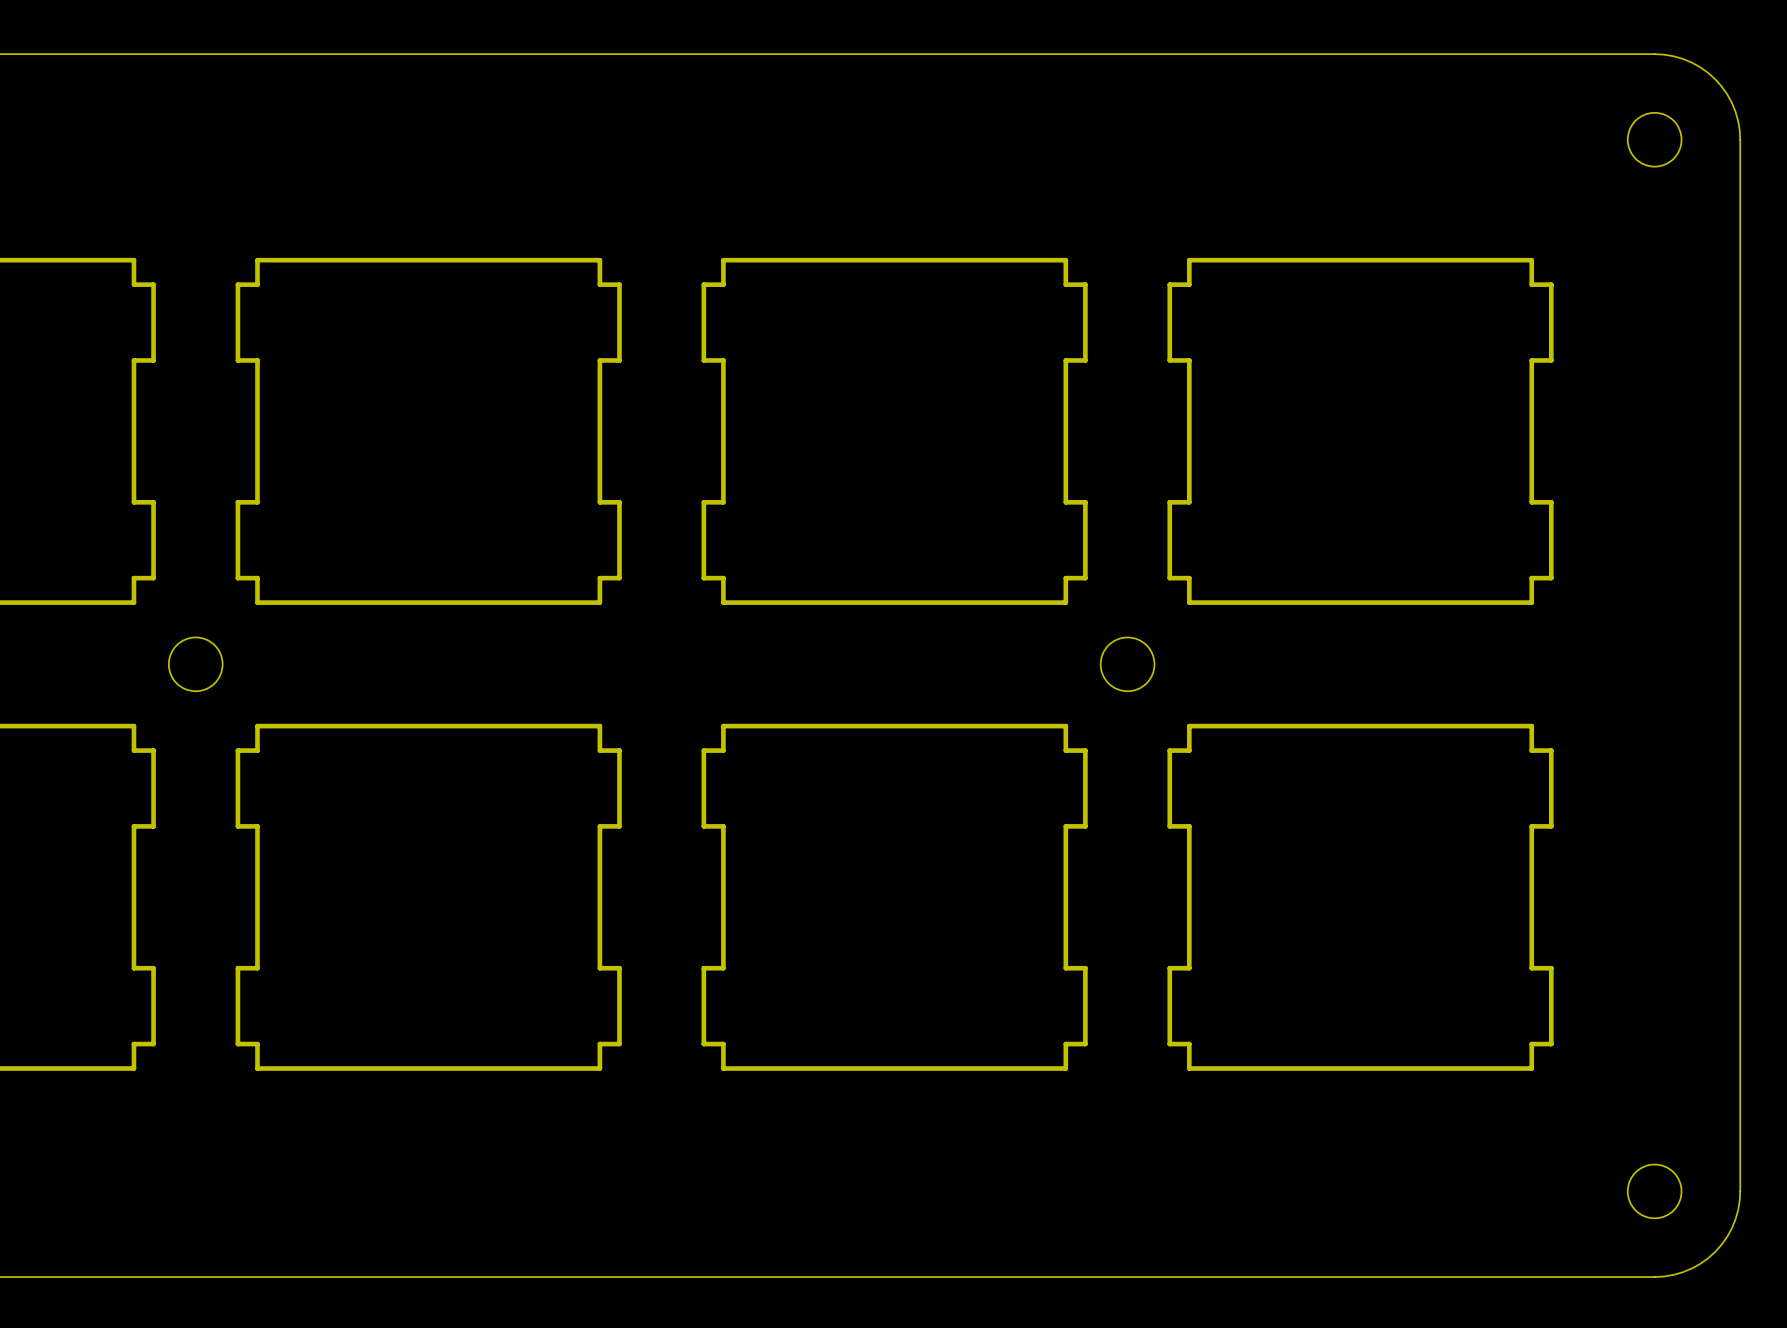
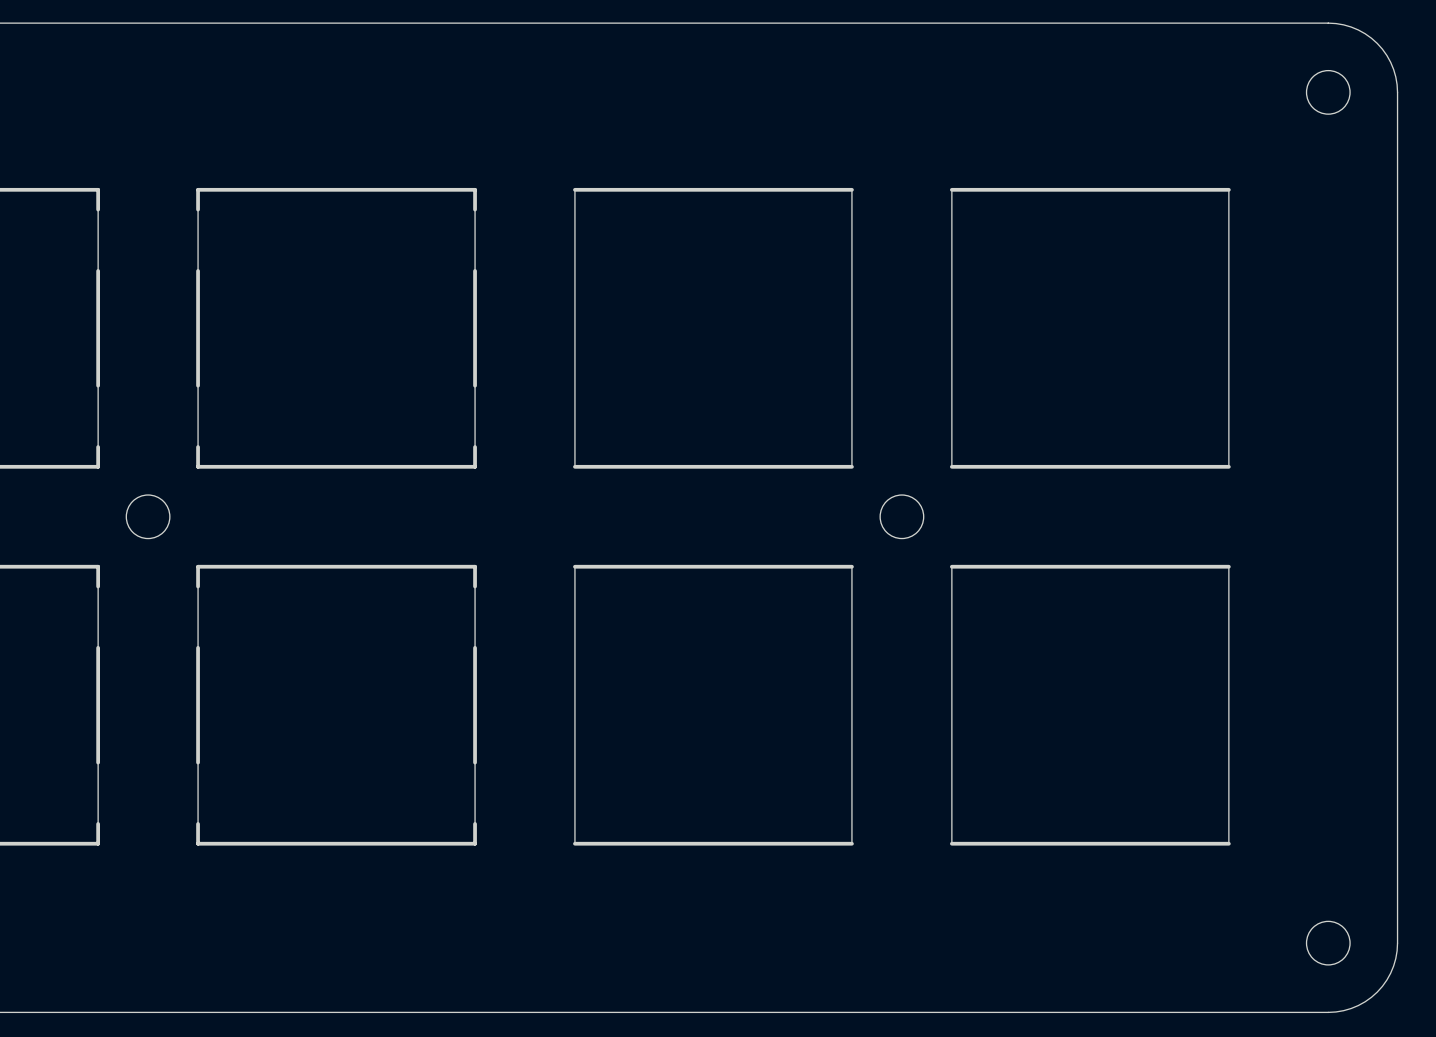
board edge: (723, 260) (723, 284) (703, 284) (703, 360) (723, 360) (723, 502) (703, 502) (703, 578) (723, 578) (723, 602) -> (574, 189) (574, 466)
board edge: (1065, 260) (1065, 284) (1085, 284) (1085, 360) (1065, 360) (1065, 502) (1085, 502) (1085, 578) (1065, 578) (1065, 602) -> (851, 189) (851, 466)
board edge: (1189, 260) (1189, 284) (1169, 284) (1169, 360) (1189, 360) (1189, 502) (1169, 502) (1169, 578) (1189, 578) (1189, 602) -> (951, 189) (951, 466)
board edge: (1531, 260) (1531, 284) (1551, 284) (1551, 360) (1531, 360) (1531, 502) (1551, 502) (1551, 578) (1531, 578) (1531, 602) -> (1228, 189) (1228, 466)
board edge: (133, 284) (153, 284) (153, 360) (133, 360) -> (98, 189) (98, 270)
board edge: (257, 284) (237, 284) (237, 360) (257, 360) -> (198, 209) (198, 270)
board edge: (599, 284) (619, 284) (619, 360) (599, 360) -> (475, 209) (475, 270)
board edge: (133, 502) (153, 502) (153, 578) (133, 578) -> (98, 385) (98, 447)
board edge: (257, 502) (237, 502) (237, 578) (257, 578) -> (198, 385) (198, 447)
board edge: (599, 502) (619, 502) (619, 578) (599, 578) -> (475, 385) (475, 447)
board edge: (723, 726) (723, 750) (703, 750) (703, 826) (723, 826) (723, 968) (703, 968) (703, 1044) (723, 1044) (723, 1068) -> (574, 566) (574, 843)
board edge: (1065, 726) (1065, 750) (1085, 750) (1085, 826) (1065, 826) (1065, 968) (1085, 968) (1085, 1044) (1065, 1044) (1065, 1068) -> (851, 566) (851, 843)
board edge: (1189, 726) (1189, 750) (1169, 750) (1169, 826) (1189, 826) (1189, 968) (1169, 968) (1169, 1044) (1189, 1044) (1189, 1068) -> (951, 566) (951, 843)
board edge: (1531, 726) (1531, 750) (1551, 750) (1551, 826) (1531, 826) (1531, 968) (1551, 968) (1551, 1044) (1531, 1044) (1531, 1068) -> (1228, 566) (1228, 843)
board edge: (133, 750) (153, 750) (153, 826) (133, 826) -> (98, 566) (98, 647)
board edge: (257, 750) (237, 750) (237, 826) (257, 826) -> (198, 586) (198, 647)
board edge: (599, 750) (619, 750) (619, 826) (599, 826) -> (475, 586) (475, 647)
board edge: (133, 968) (153, 968) (153, 1044) (133, 1044) -> (98, 762) (98, 823)
board edge: (257, 968) (237, 968) (237, 1044) (257, 1044) -> (198, 762) (198, 823)
board edge: (599, 968) (619, 968) (619, 1044) (599, 1044) -> (475, 762) (475, 823)

